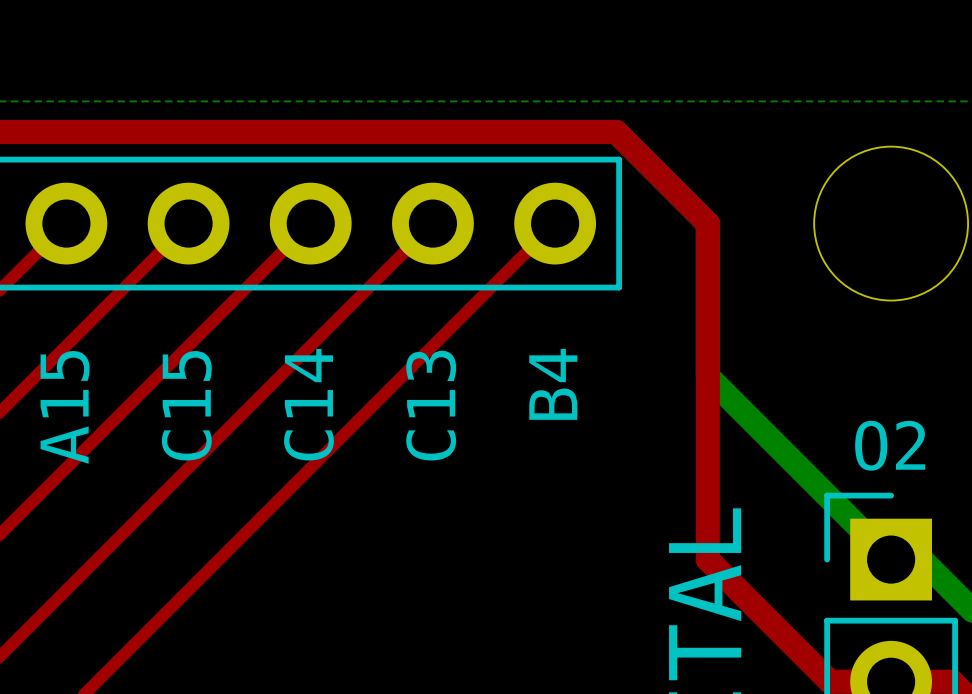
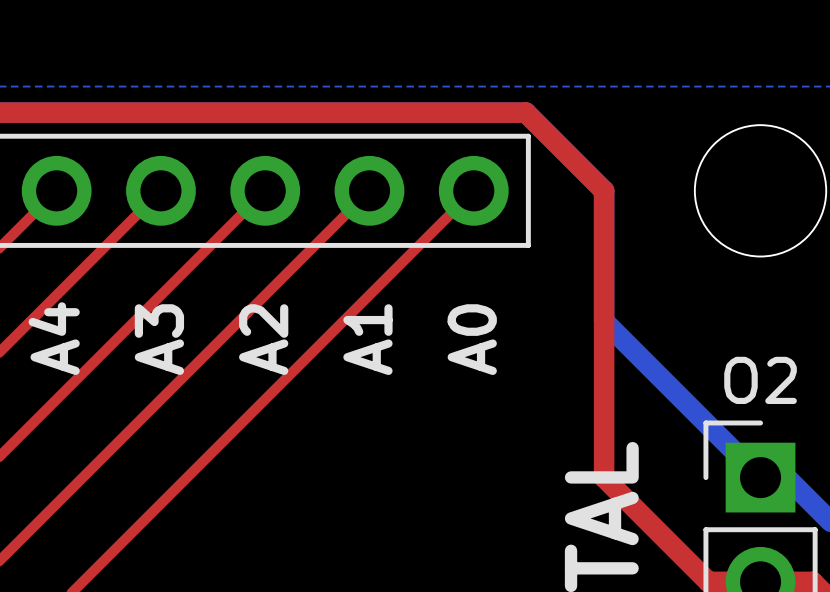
text: B4 (553, 384) -> A0 (472, 339)
text: C14 (309, 404) -> A2 (263, 339)
text: C15 (186, 405) -> A3 (159, 339)
text: C13 (431, 405) -> A1 (367, 339)
text: A15 (65, 407) -> A4 (54, 338)

